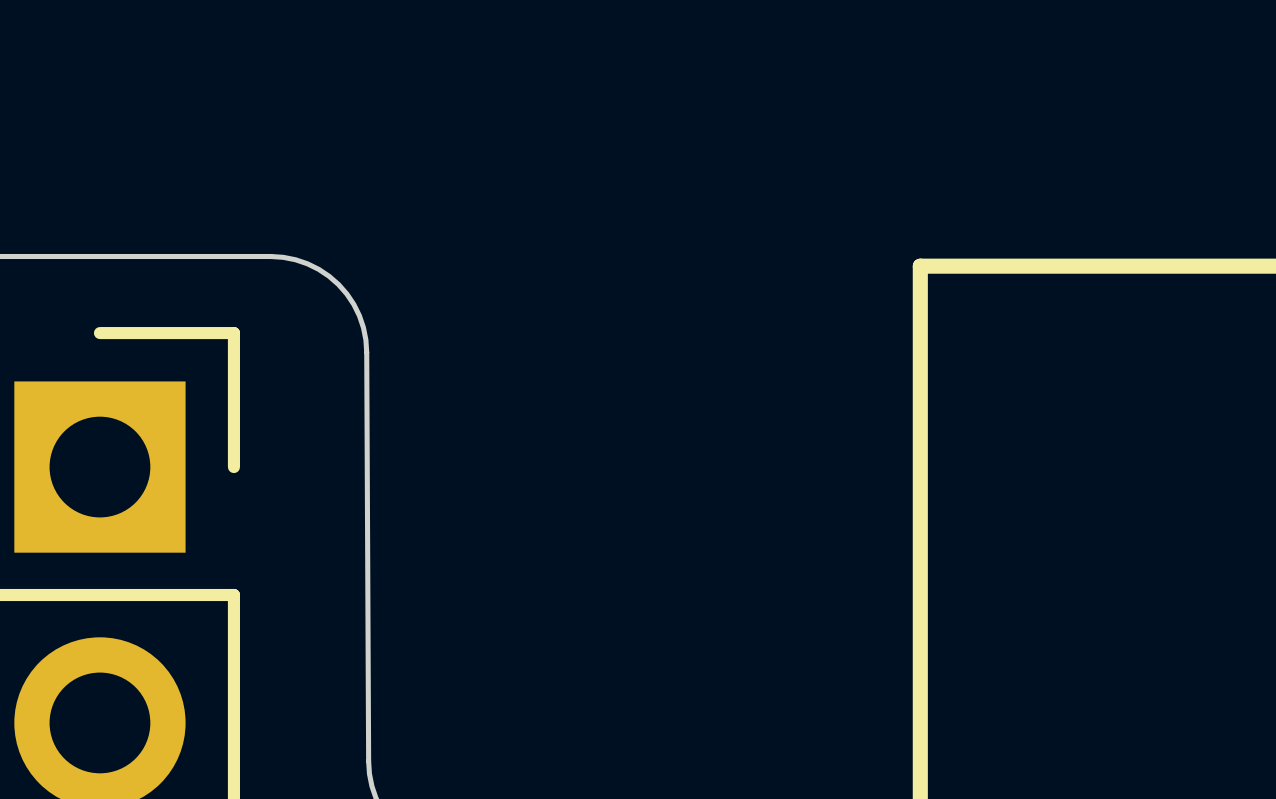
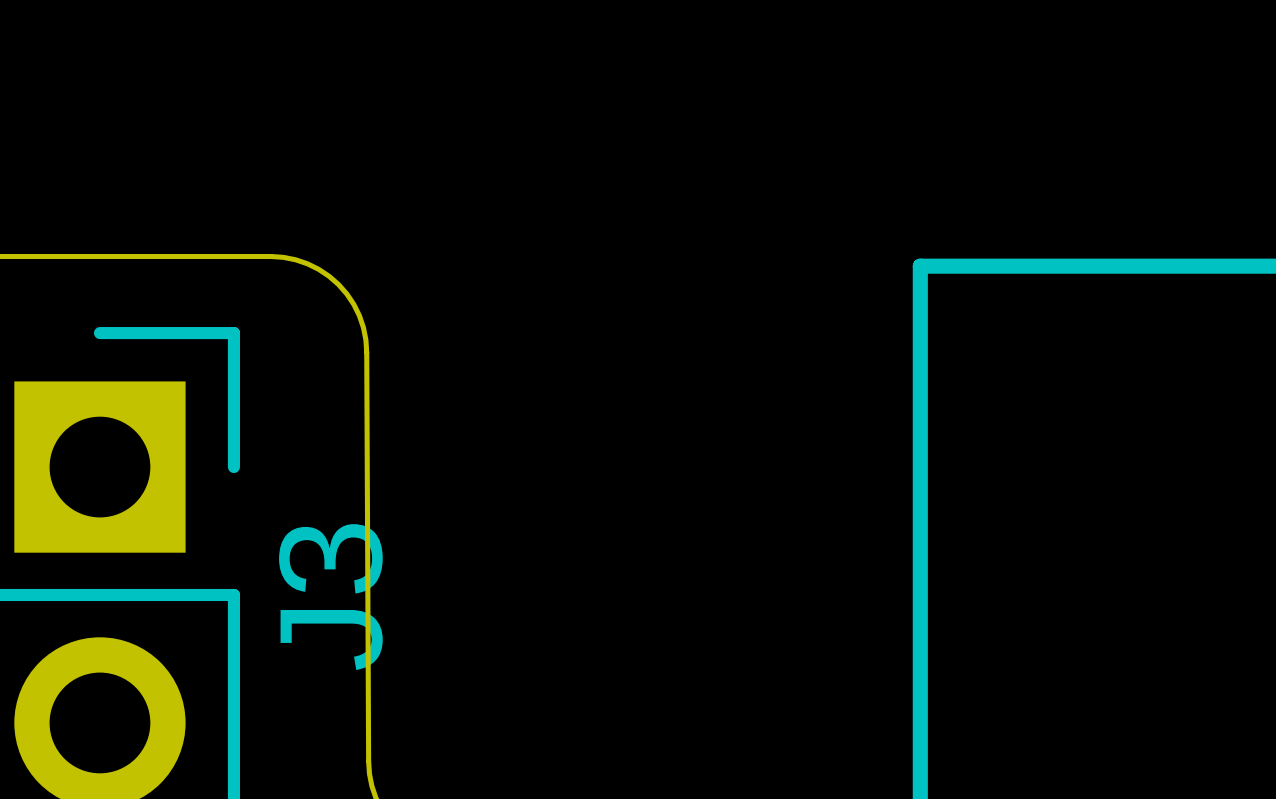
J3 name: none -> J3 (330, 597)

